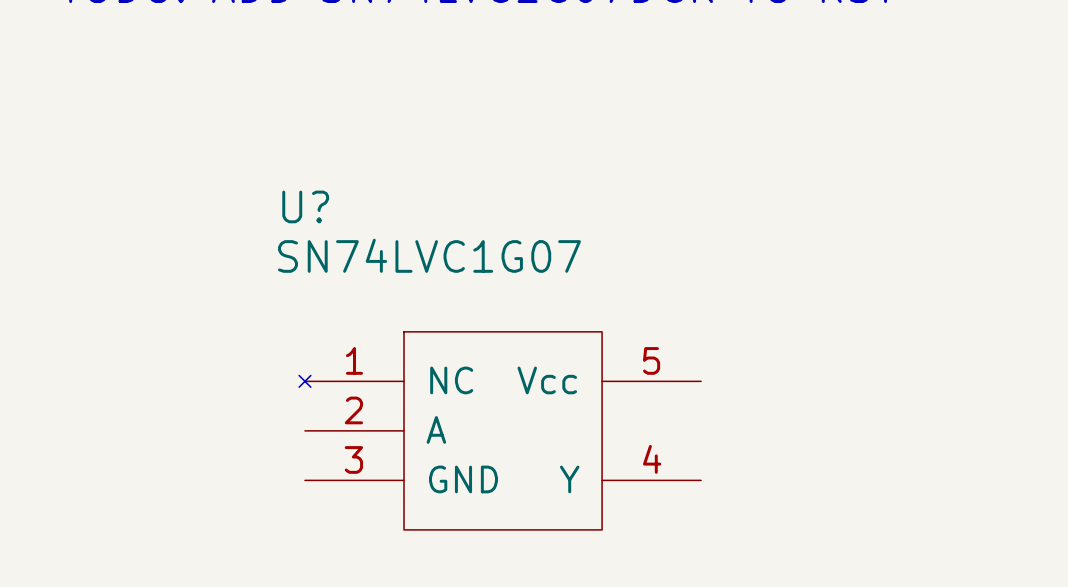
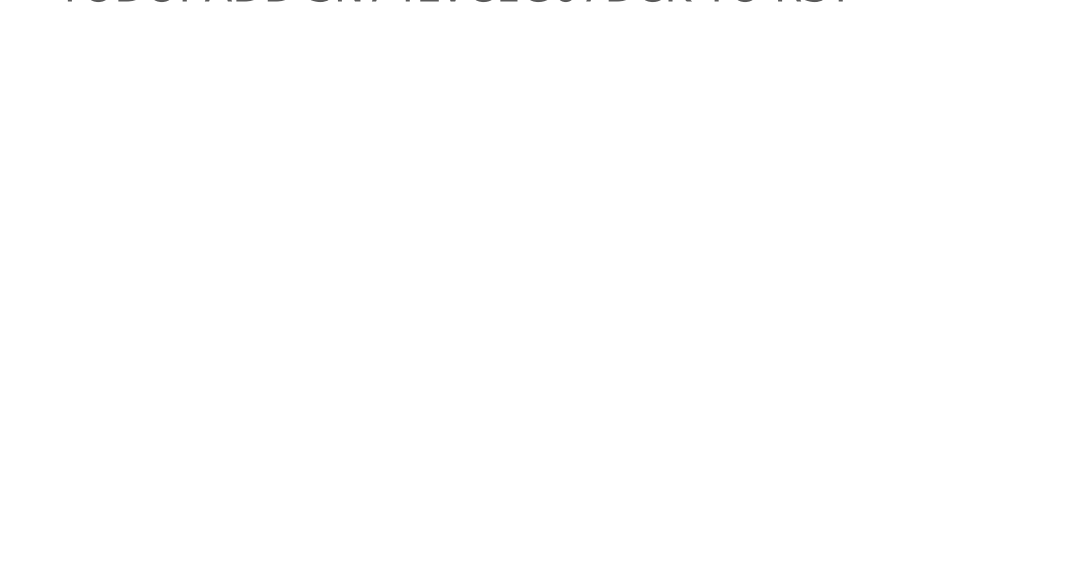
U?: SN74LVC1G07 (500, 430) -> none

